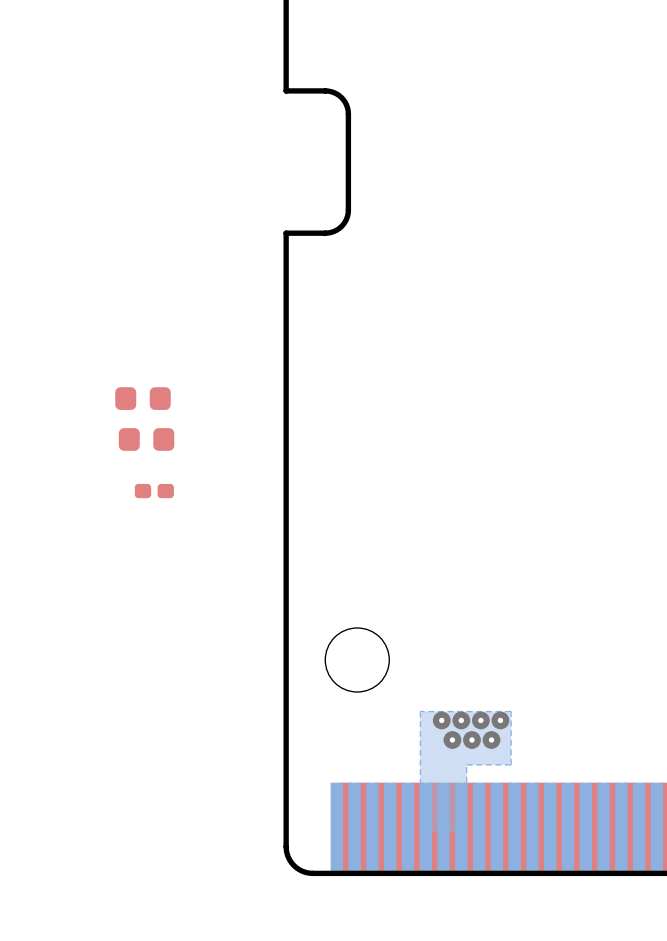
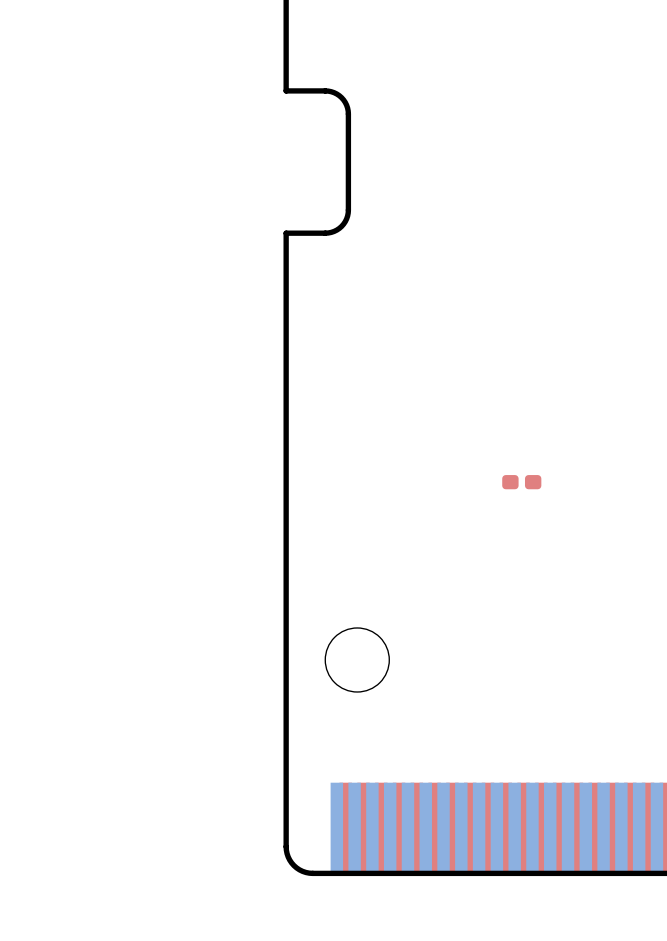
part: (142, 398) -> none
part: (146, 439) -> none
part position: (154, 491) -> (521, 482)
bottom zone outline: (511, 711) (511, 764) (466, 764) (466, 830) (420, 830) (420, 711) (511, 711) -> none
via: (441, 720) -> none
via: (461, 720) -> none
via: (480, 720) -> none
via: (500, 720) -> none
via: (452, 740) -> none
via: (471, 740) -> none
via: (491, 740) -> none

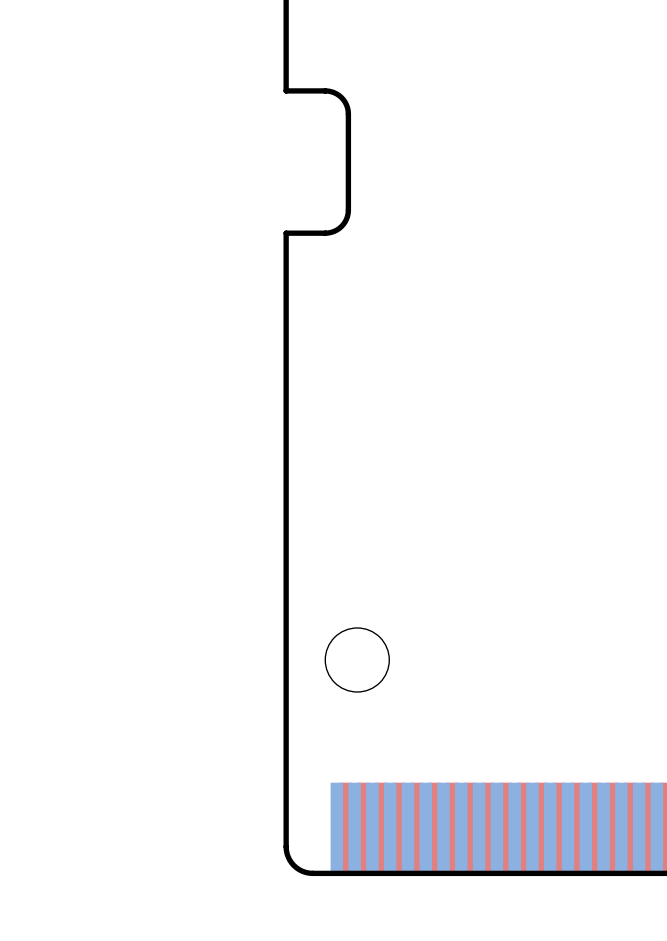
part: (521, 482) -> none

